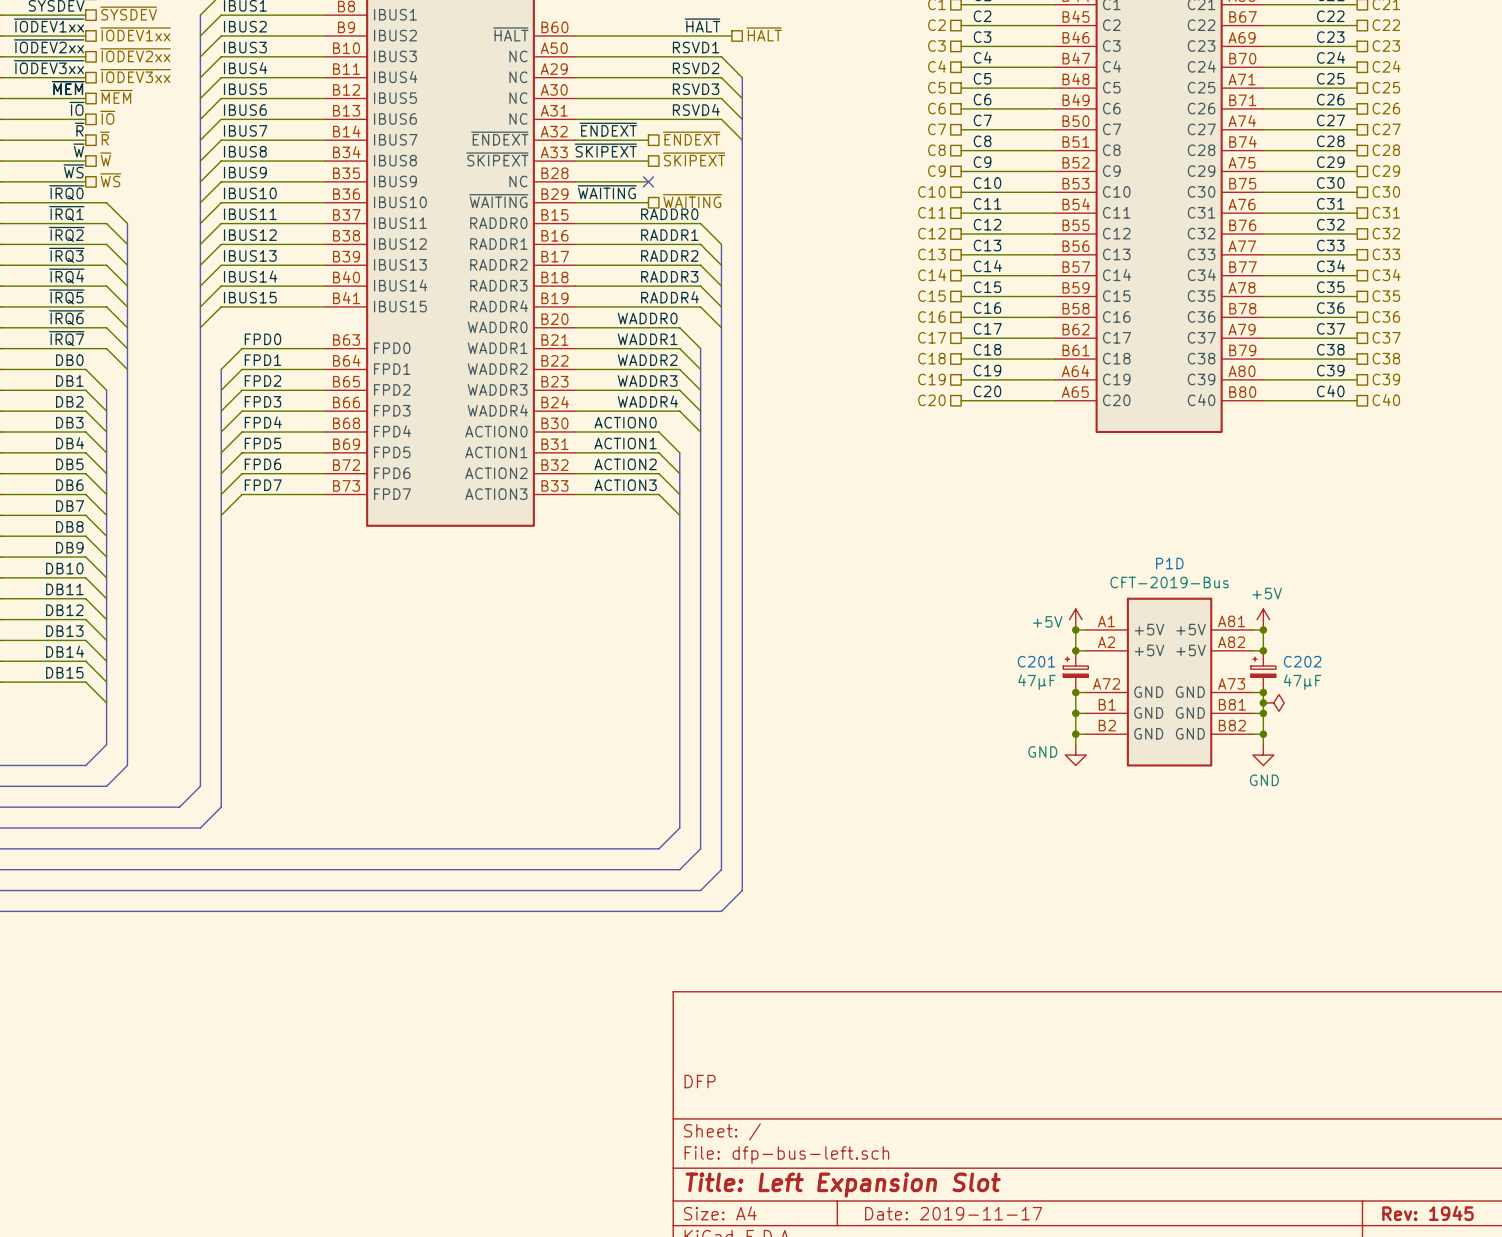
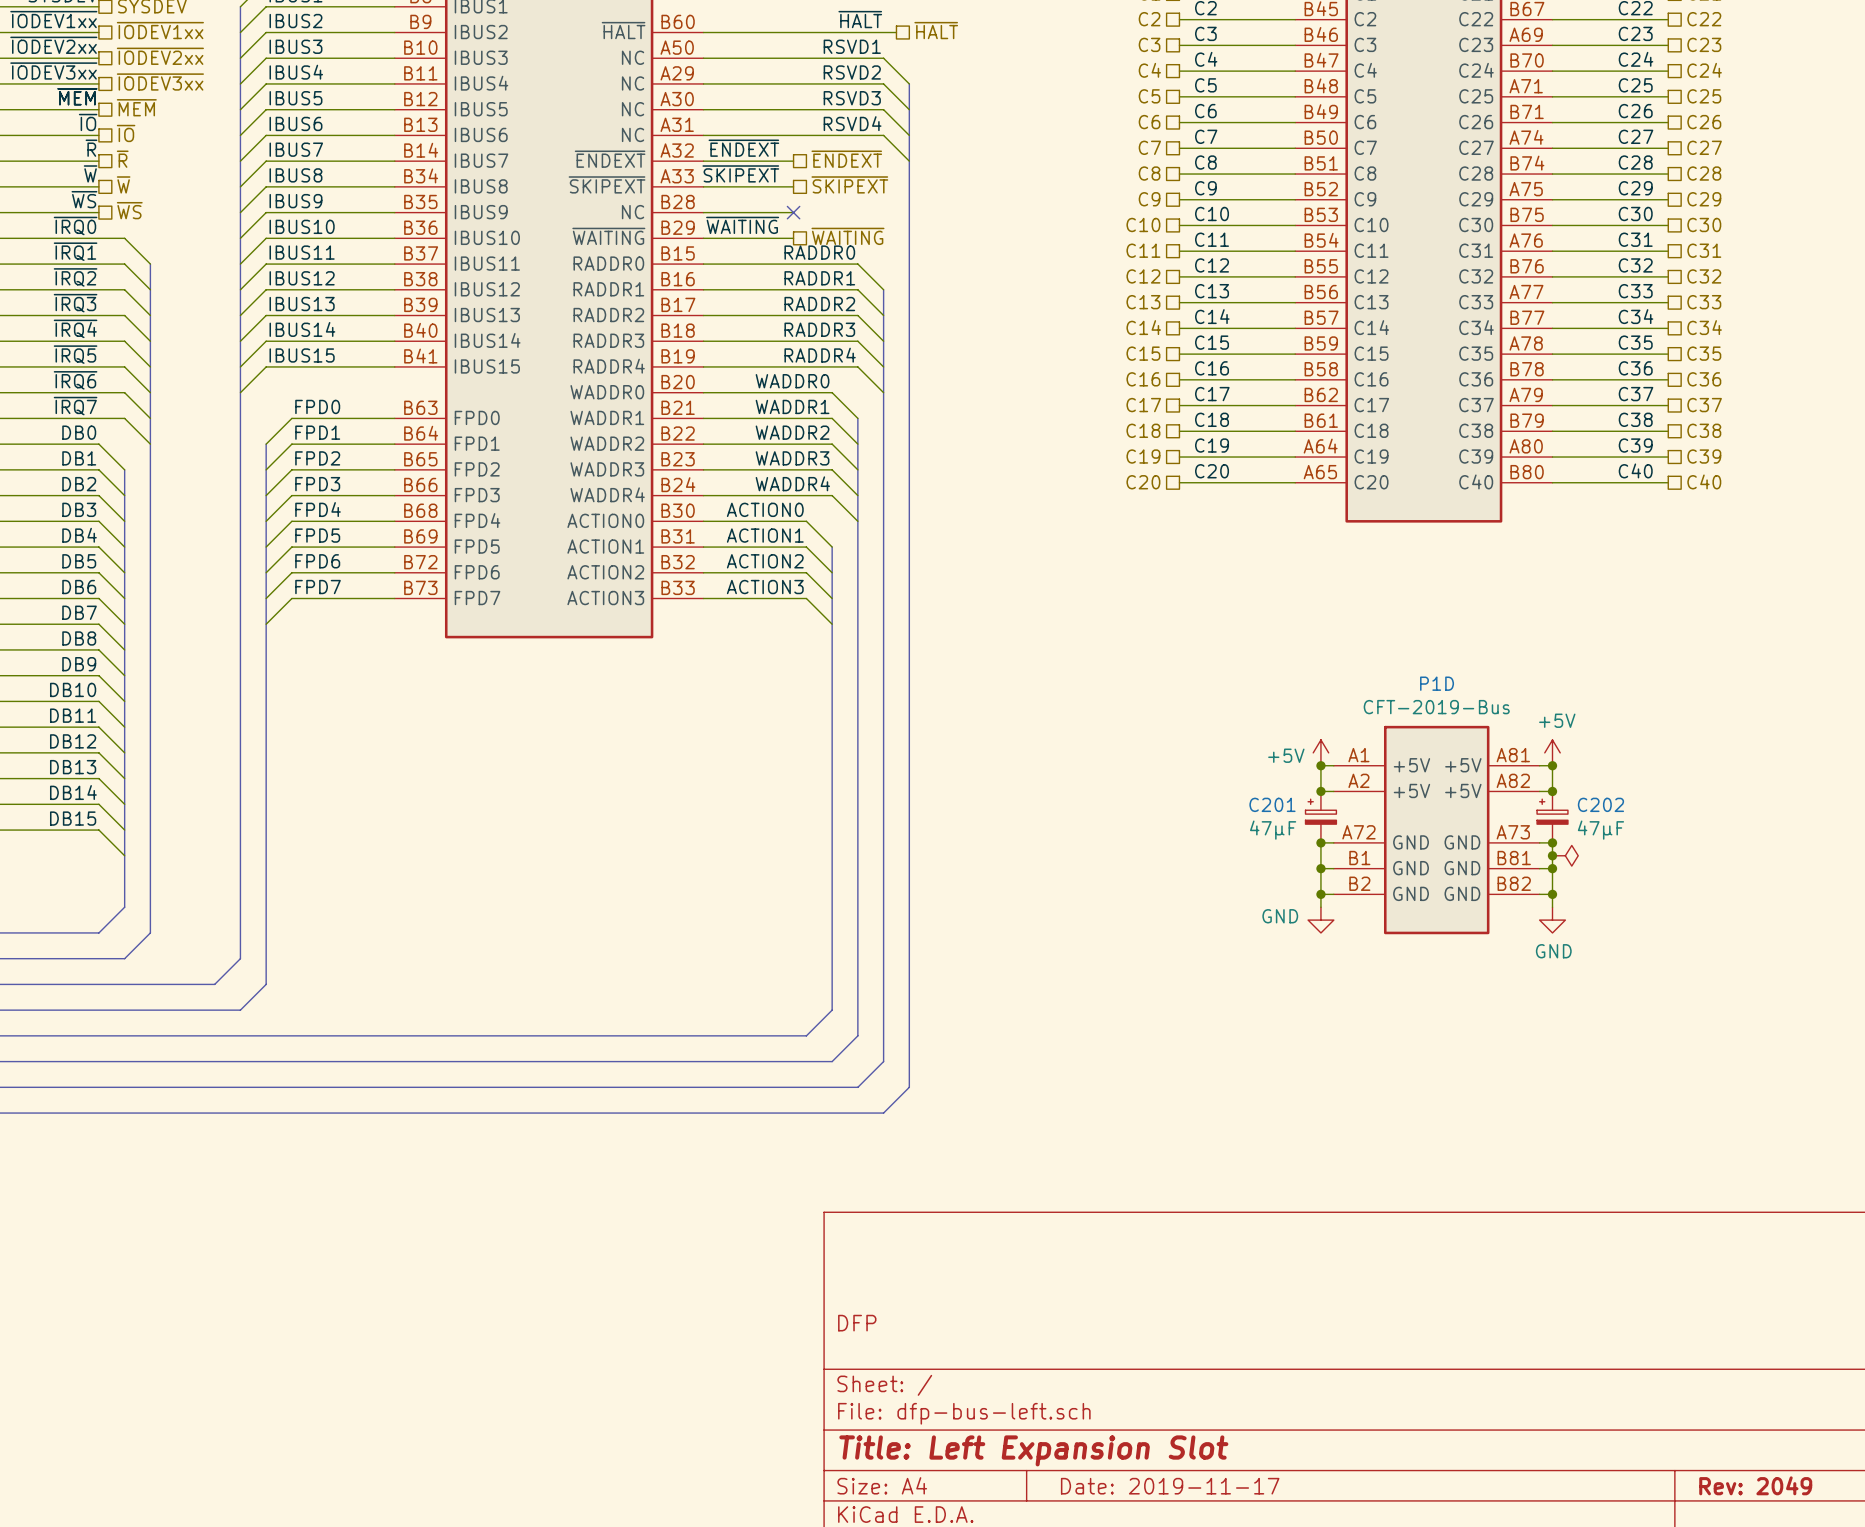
title block: Rev: 1945 (1428, 1213) -> Rev: 2049 (1755, 1485)

